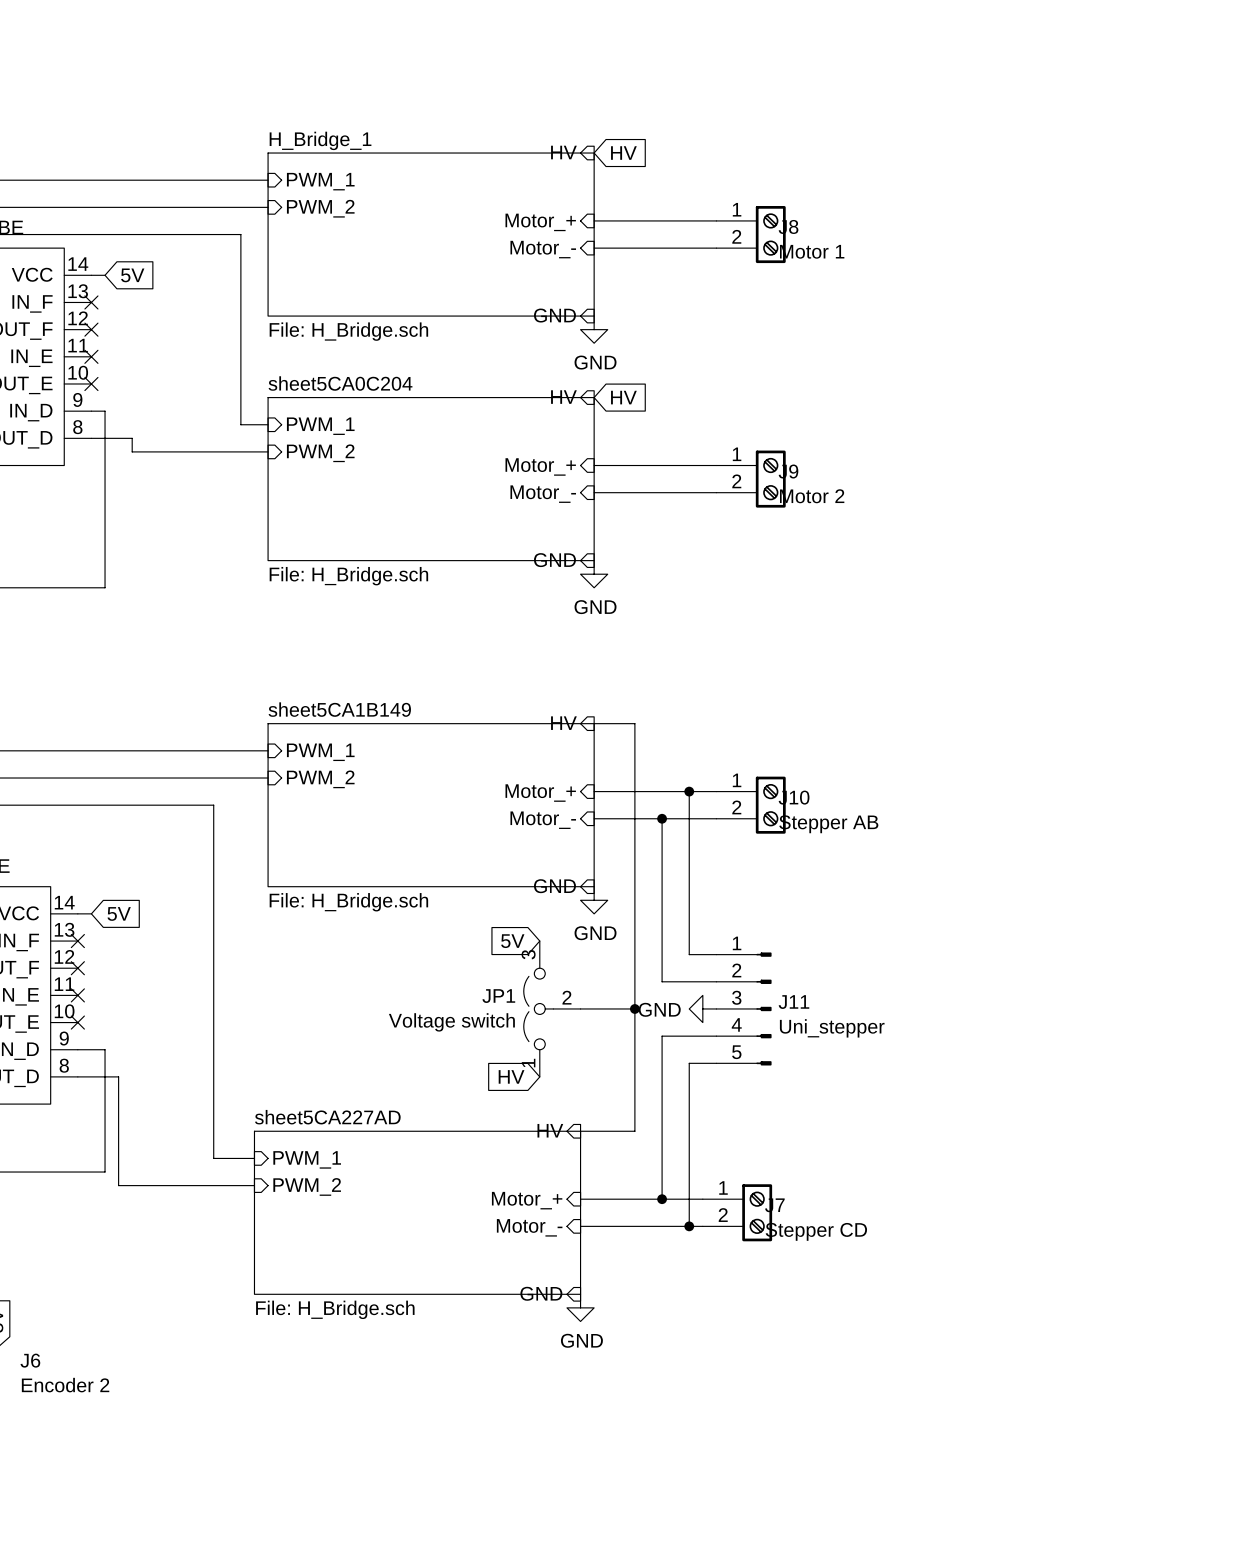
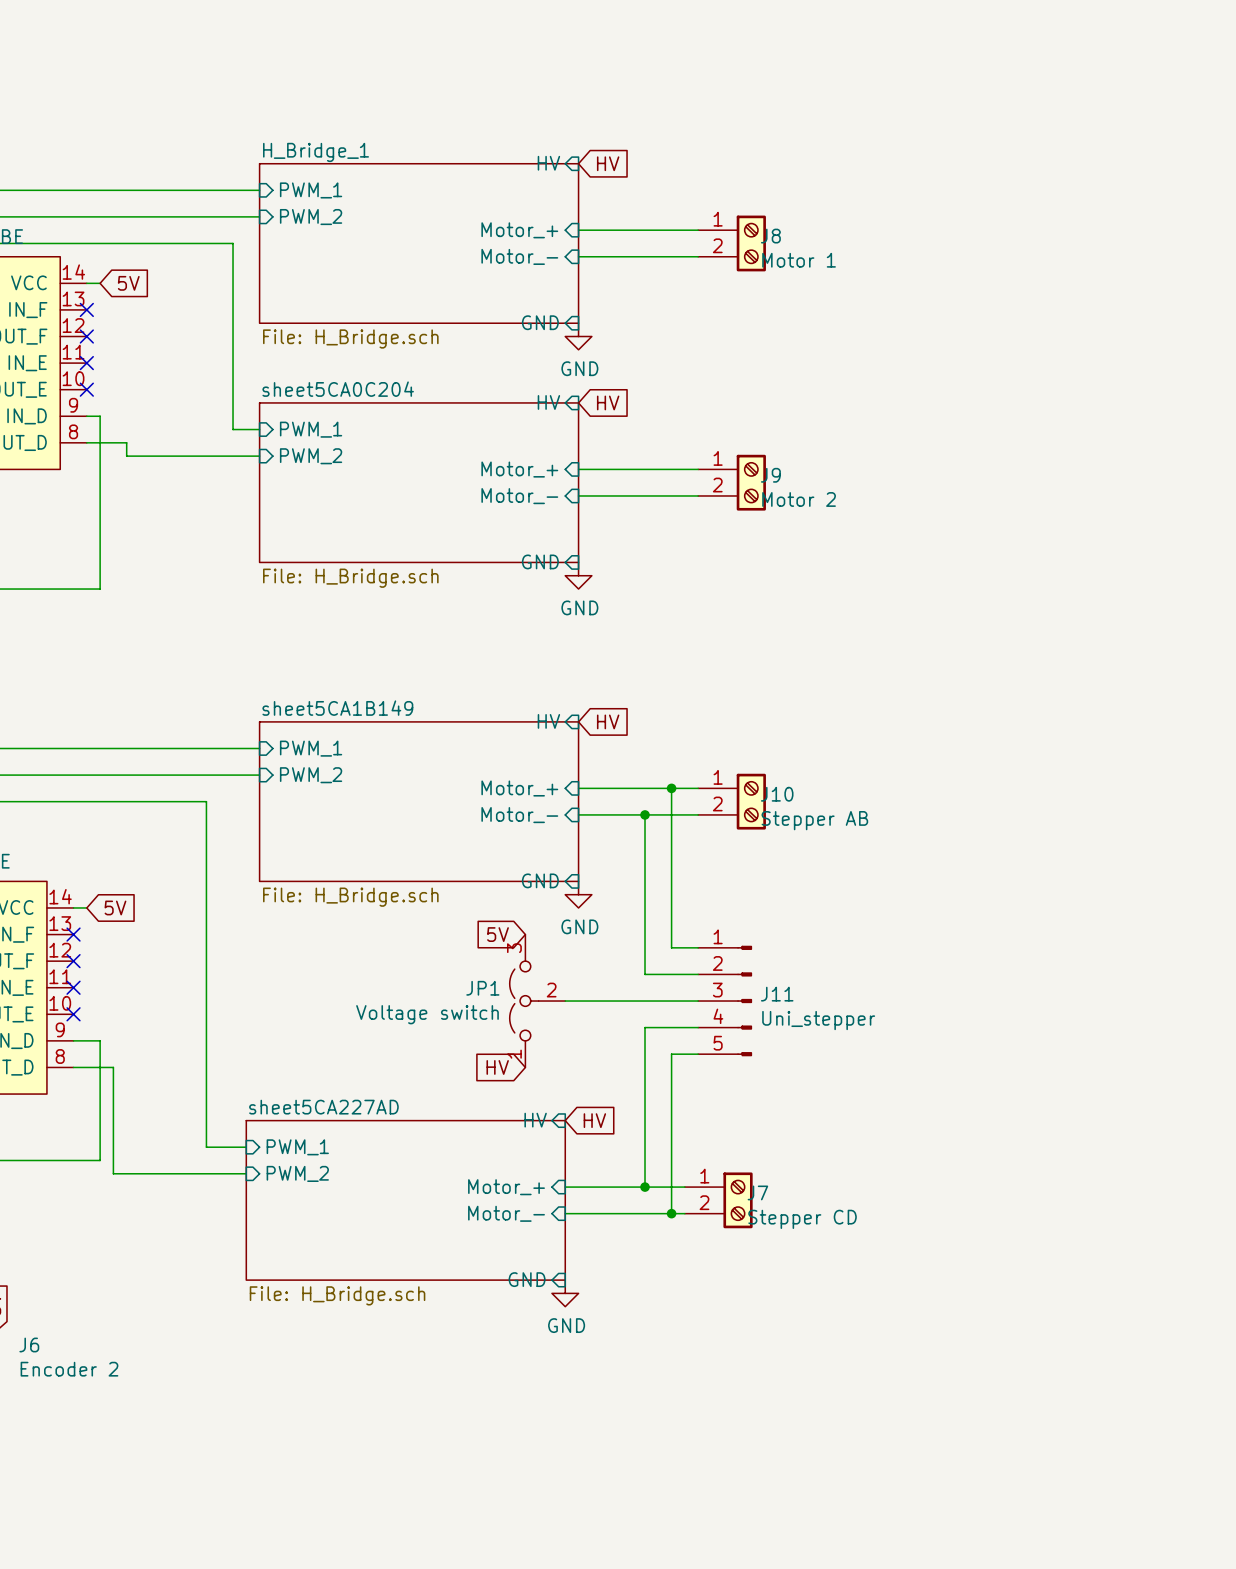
wire: (594, 723) (634, 723) (634, 1131) (580, 1131) -> none
global label: none -> HV (608, 721)
wire: none -> (618, 1001) (698, 1001)
junction: (634, 1008) -> none
power symbol: GND (702, 1008) -> none
global label: none -> HV (594, 1120)

